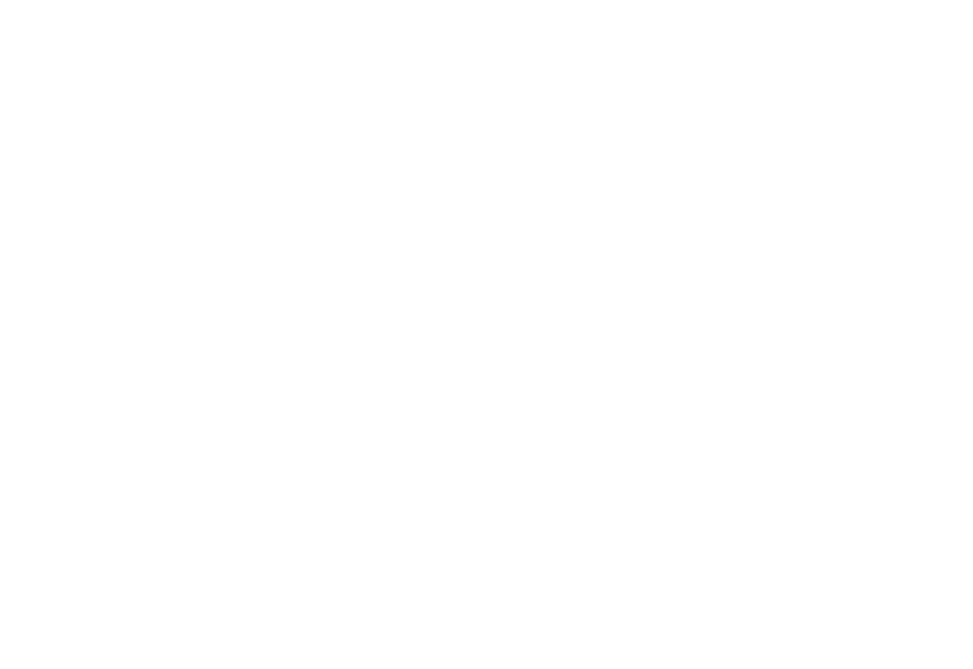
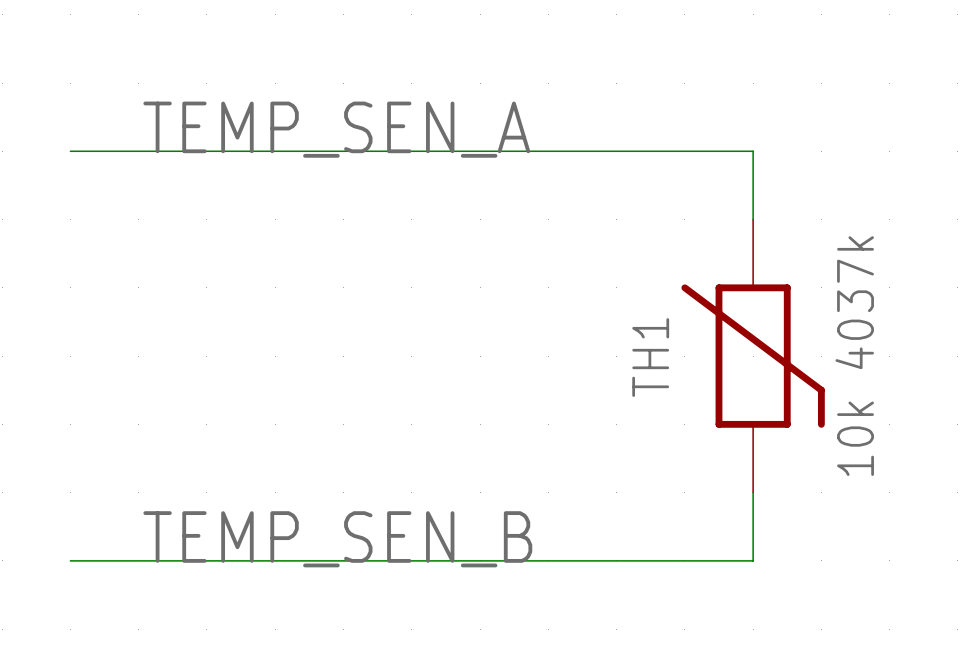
label: none -> TEMP_SEN_A (336, 129)
wire: none -> (70, 151) (753, 151) (753, 219)
TH1: none -> 10k 4037k (753, 356)
wire: none -> (753, 492) (753, 560) (70, 560)
label: none -> TEMP_SEN_B (337, 539)

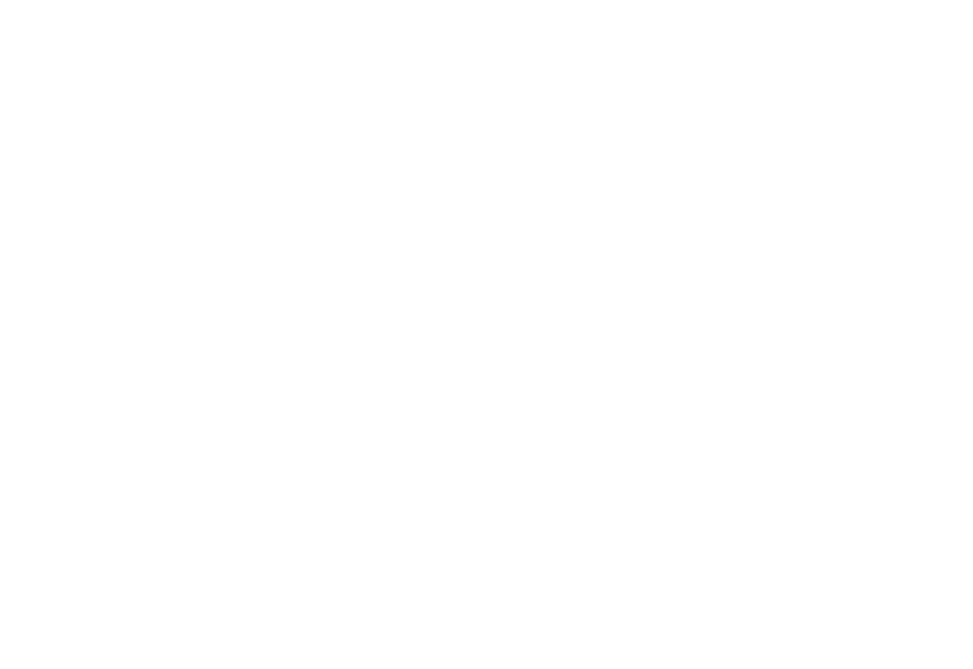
label: TEMP_SEN_A (336, 129) -> none
wire: (70, 151) (753, 151) (753, 219) -> none
TH1: 10k 4037k (753, 356) -> none
wire: (753, 492) (753, 560) (70, 560) -> none
label: TEMP_SEN_B (337, 539) -> none

